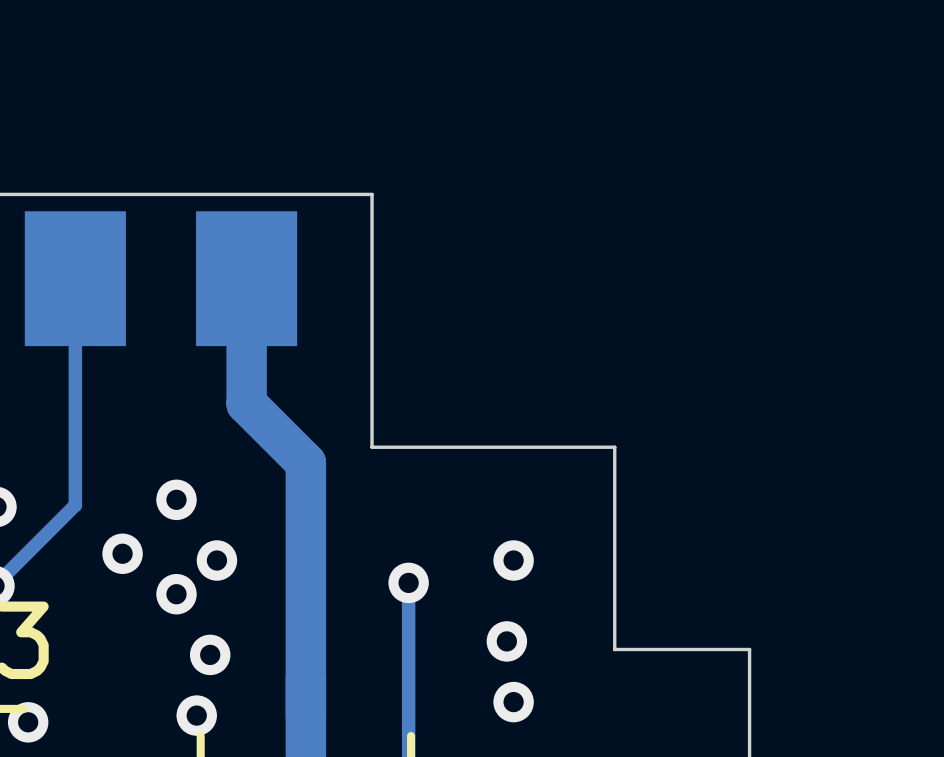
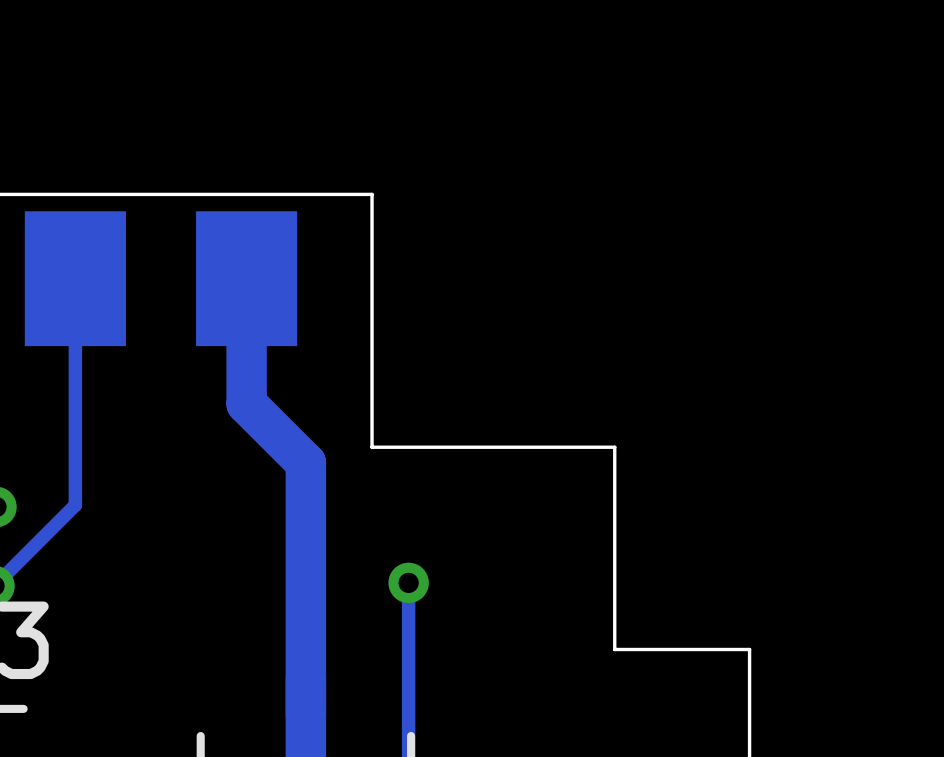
via: (176, 499) -> none
via: (122, 553) -> none
via: (216, 560) -> none
via: (513, 560) -> none
via: (176, 594) -> none
via: (506, 641) -> none
via: (210, 654) -> none
via: (513, 702) -> none
via: (196, 715) -> none
via: (28, 722) -> none

